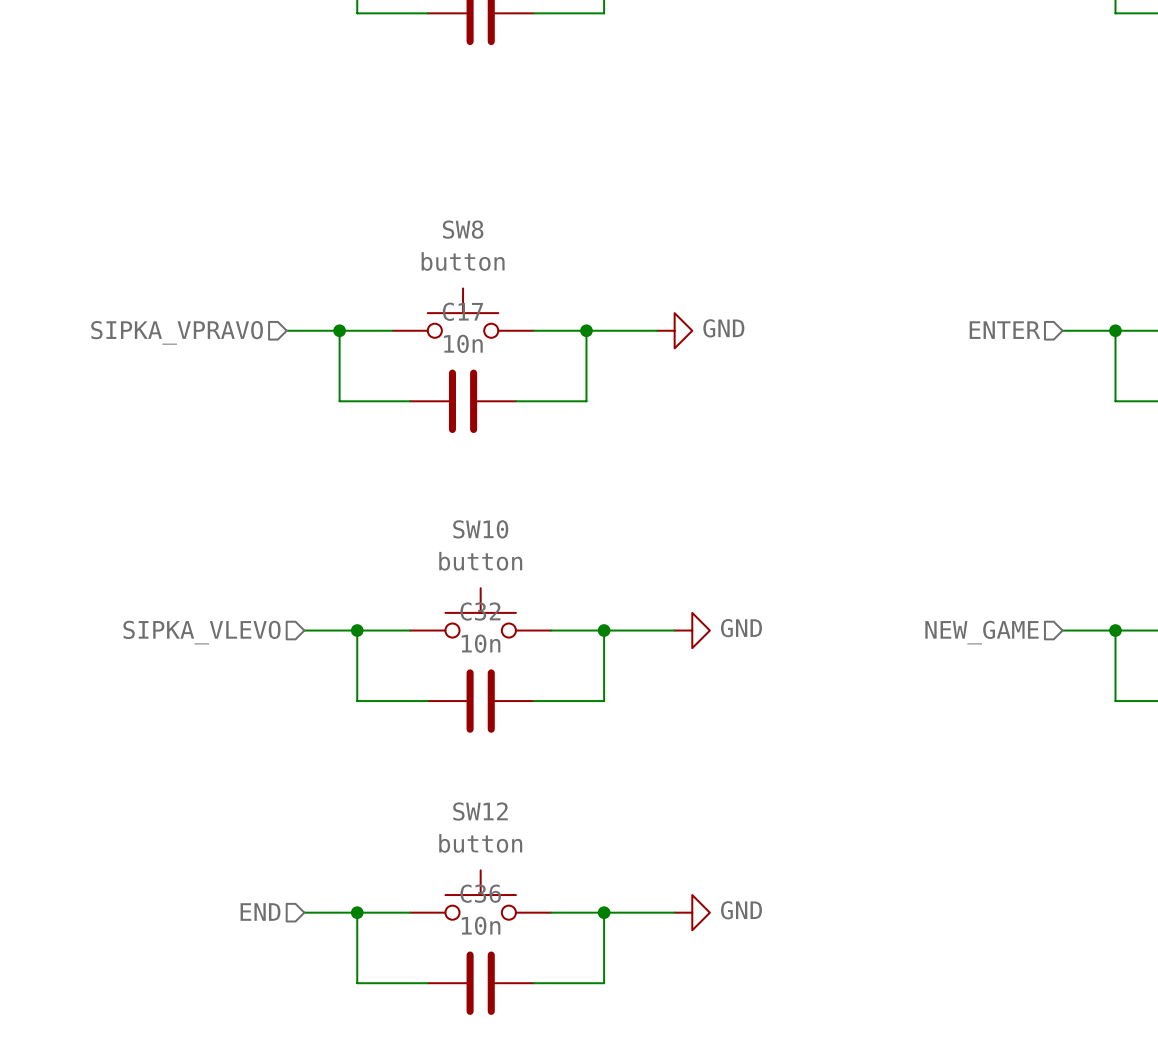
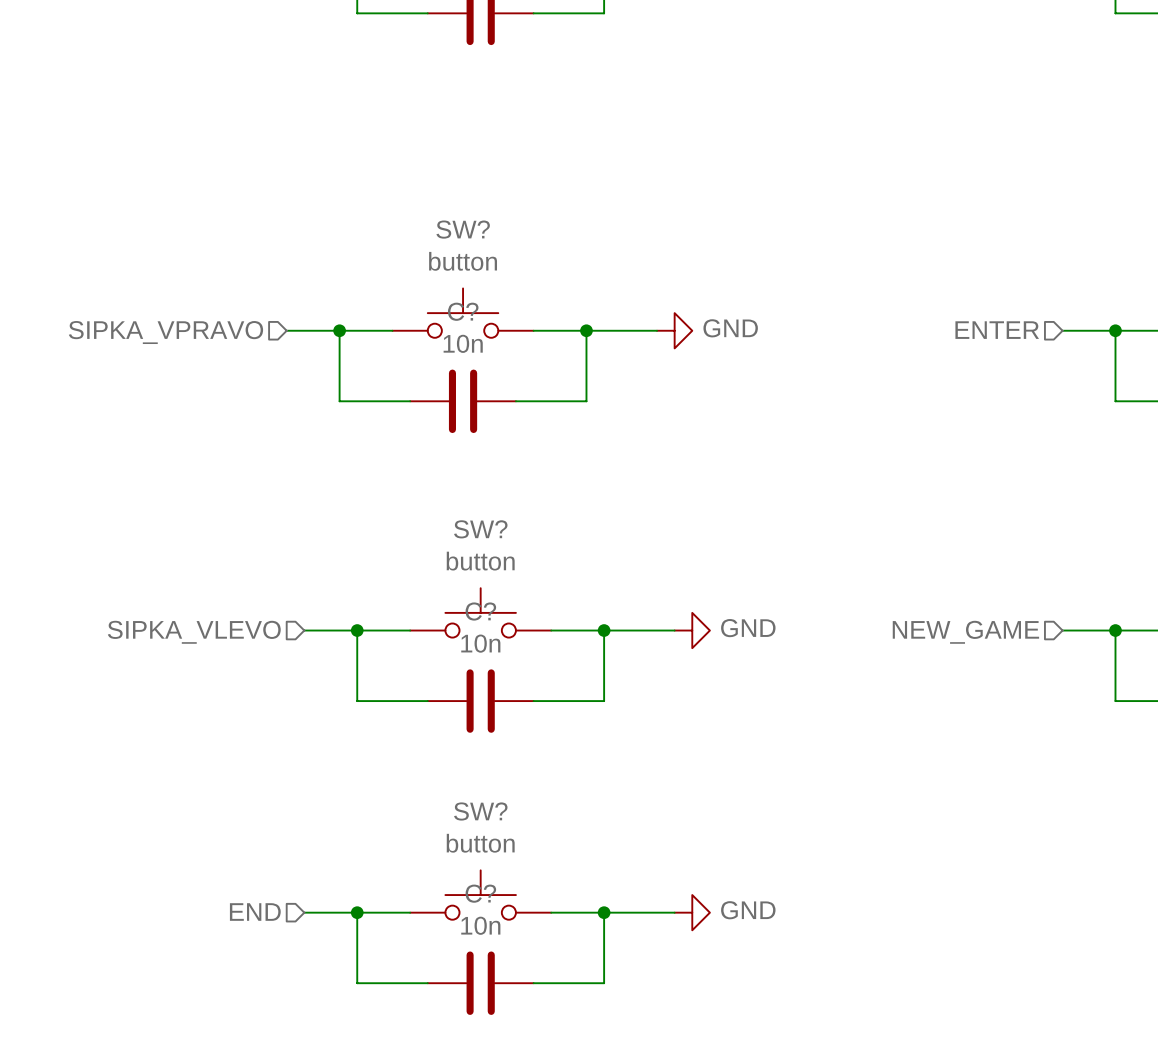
SW8 name: SW8 (463, 229) -> SW? (463, 229)
C17 name: C17 (462, 311) -> C? (463, 311)
SW10 name: SW10 (480, 529) -> SW? (480, 529)
C32 name: C32 (480, 611) -> C? (480, 611)
SW12 name: SW12 (480, 811) -> SW? (480, 811)
C36 name: C36 (480, 893) -> C? (480, 893)

